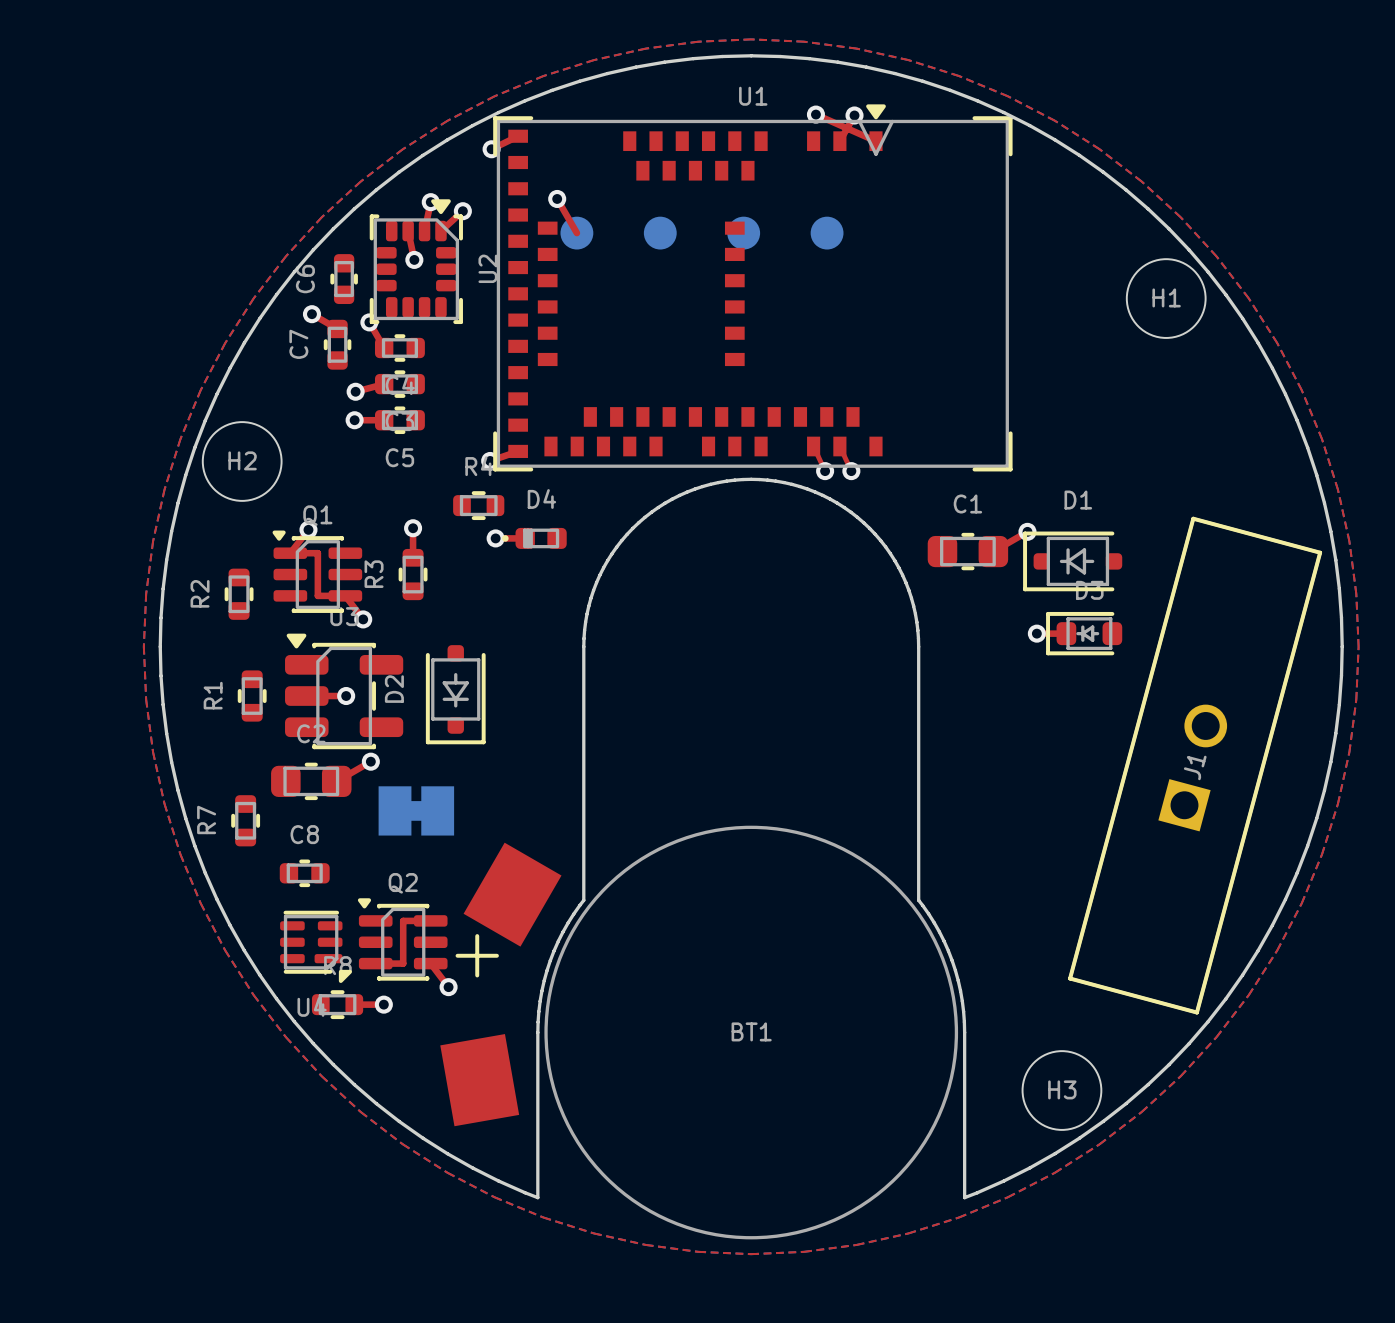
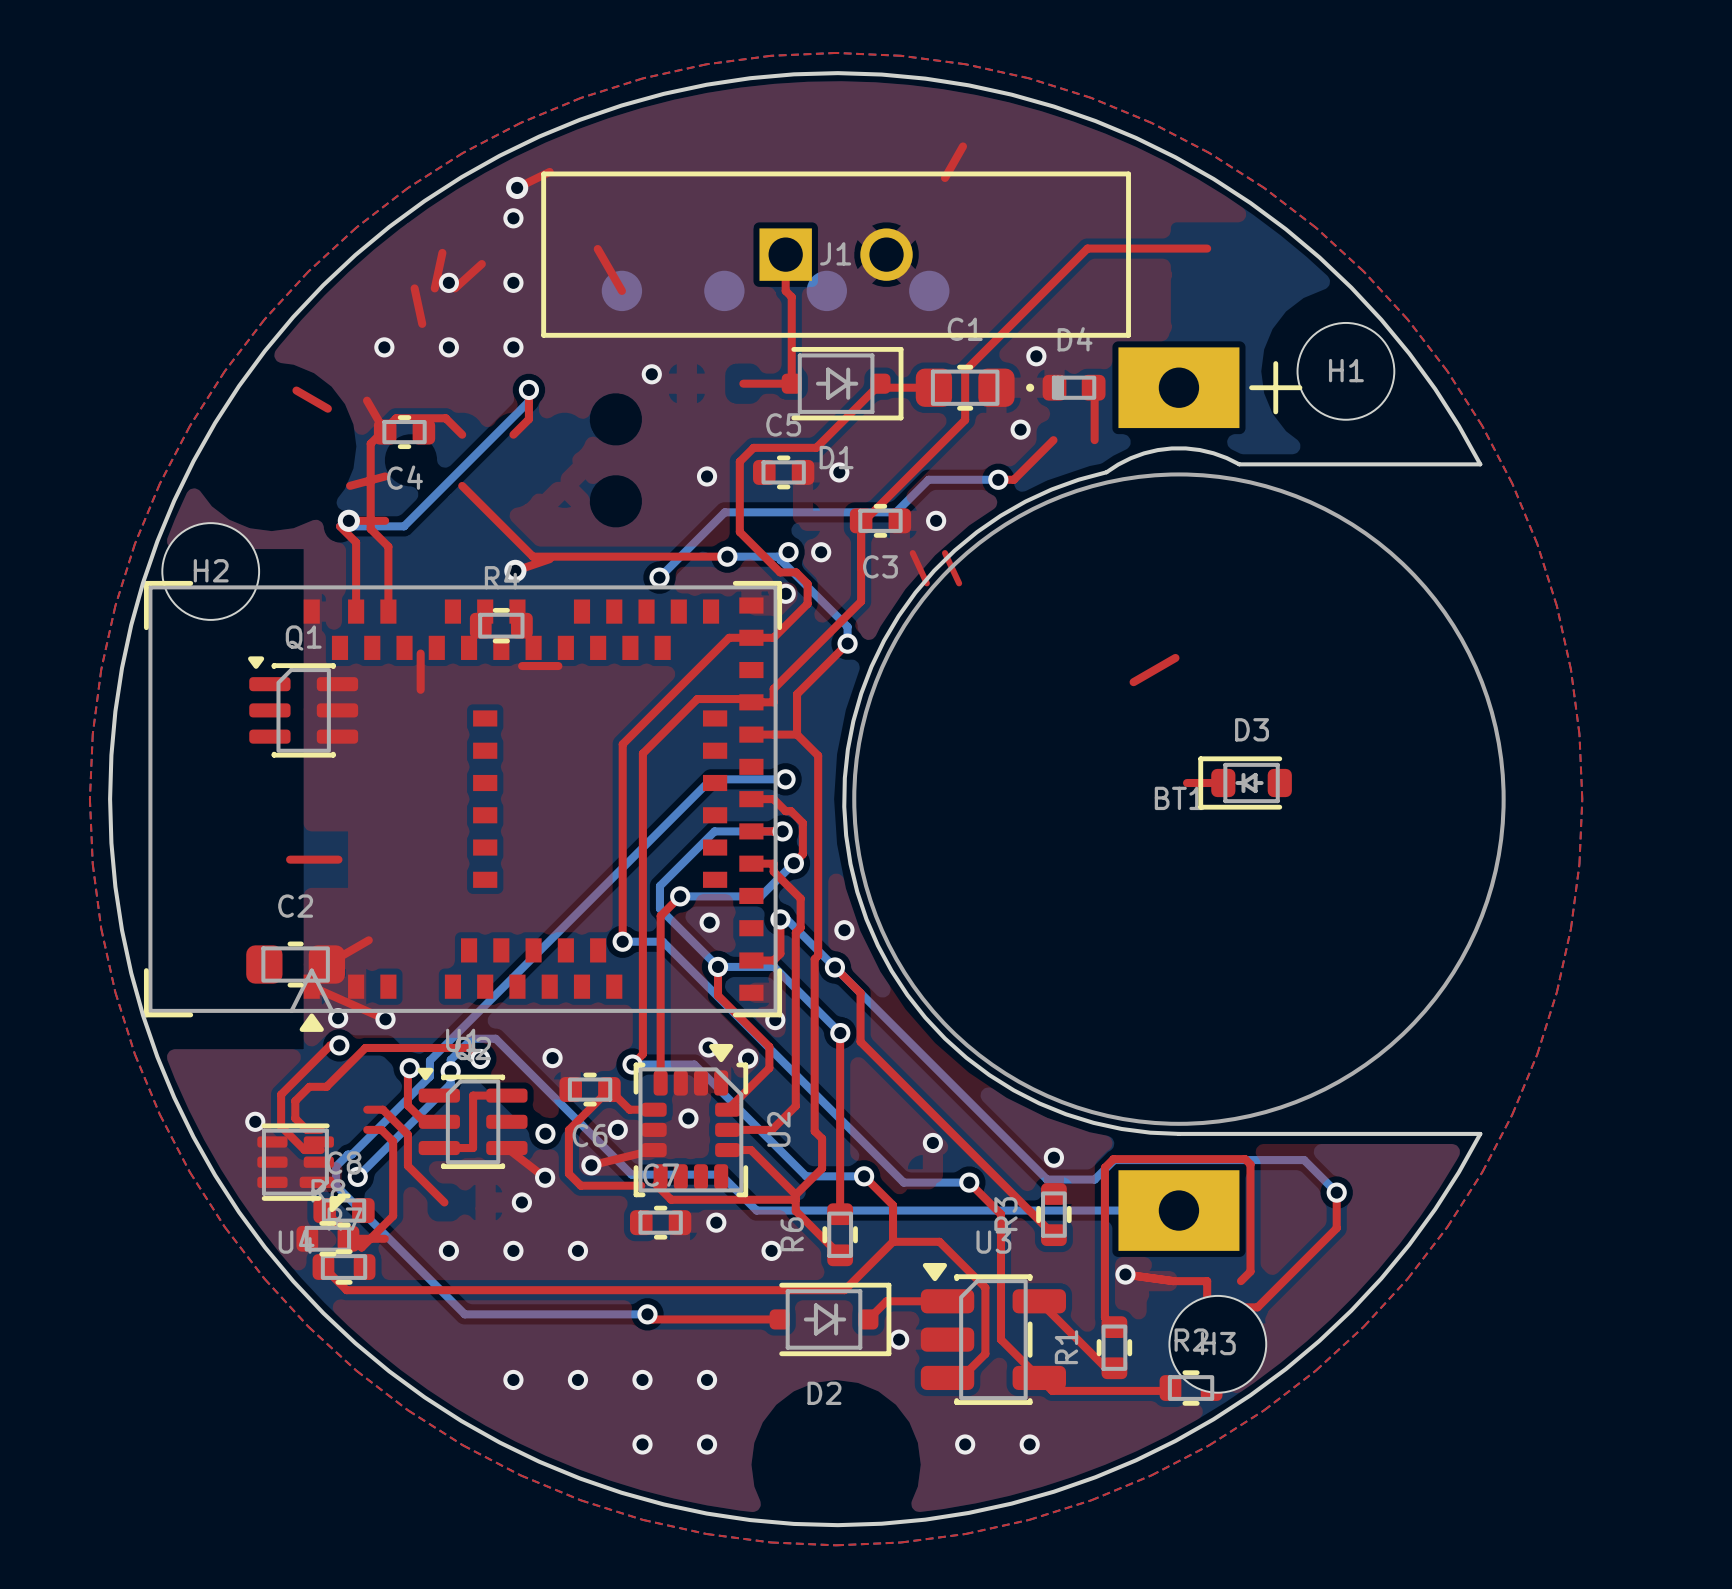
board edge: (751, 55) (693, 58) (635, 67) (552, 90) (472, 125) (422, 155) (376, 189) (333, 228) (294, 271) (244, 342) (217, 394) (194, 447) (171, 531) (163, 588) (160, 646) (166, 733) (185, 818) (205, 872) (230, 925) (259, 975) (294, 1021) (354, 1084) (399, 1121) (447, 1153) (498, 1181) (537, 1197) (537, 1032) (540, 1001) (547, 970) (554, 950) (568, 922) (583, 900) (583, 646) (587, 614) (596, 582) (616, 547) (645, 517) (672, 499) (702, 486) (734, 480) (767, 480) (807, 489) (844, 507) (869, 528) (890, 553) (905, 582) (913, 606) (918, 638) (918, 900) (934, 922) (948, 950) (955, 970) (962, 1001) (964, 1032) (964, 1197) (1029, 1167) (1103, 1121) (1169, 1064) (1208, 1021) (1242, 975) (1285, 899) (1316, 818) (1330, 762) (1339, 704) (1342, 646) (1335, 560) (1324, 503) (1307, 447) (1285, 394) (1242, 318) (1208, 271) (1169, 228) (1126, 189) (1079, 155) (1003, 112) (922, 81) (866, 67) (809, 58) (751, 55) -> (1239, 464) (1213, 453) (1185, 448) (1157, 450) (1144, 453) (1118, 464) (1106, 472) (1078, 479) (1025, 501) (1000, 515) (954, 550) (915, 592) (884, 640) (871, 666) (861, 693) (847, 749) (844, 806) (846, 835) (857, 891) (866, 919) (891, 970) (925, 1017) (944, 1038) (966, 1057) (1013, 1090) (1039, 1103) (1093, 1122) (1150, 1132) (1480, 1133) (1458, 1172) (1409, 1244) (1351, 1310) (1285, 1369) (1250, 1395) (1175, 1440) (1136, 1460) (1054, 1491) (968, 1512) (881, 1523) (837, 1525) (750, 1520) (663, 1504) (621, 1492) (579, 1478) (499, 1442) (424, 1397) (355, 1343) (323, 1313) (265, 1247) (215, 1175) (193, 1137) (157, 1056) (131, 973) (122, 930) (111, 843) (110, 799) (115, 711) (131, 625) (143, 582) (157, 541) (193, 461) (215, 423) (265, 350) (323, 285) (389, 227) (461, 177) (539, 136) (621, 105) (706, 84) (793, 74) (881, 74) (968, 85) (1011, 94) (1054, 106) (1136, 137) (1213, 179) (1285, 229) (1319, 257) (1381, 319) (1435, 389) (1480, 464) (1239, 464)
top track: (815, 114) (875, 141) -> none
via: (815, 114) -> none
via: (854, 115) -> none
via: none -> (513, 218)
via: (557, 198) -> none
top track: none -> (1207, 248) (1087, 248) (965, 370) (965, 420) (861, 524)
via: (430, 202) -> none
top track: none -> (785, 254) (785, 290) (791, 297) (791, 383) (743, 383)
via: (462, 211) -> none
via: none -> (448, 282)
via: none -> (513, 282)
via: (414, 259) -> none
U2 position: (416, 261) -> (690, 1120)
C6 rotation: 0° (344, 279) -> 90° clockwise (590, 1089)
C6 position: (344, 279) -> (590, 1089)
via: none -> (384, 347)
via: none -> (448, 347)
via: none -> (513, 347)
via: none -> (1036, 356)
U1 rotation: 0° (752, 287) -> 180° (463, 806)
U1 position: (752, 287) -> (463, 806)
via: none -> (651, 374)
top track: none -> (933, 387) (884, 387) (880, 383) (816, 447) (753, 447) (739, 461) (739, 532) (780, 572) (796, 572) (807, 583) (807, 603) (773, 637) (729, 637) (622, 744) (622, 941)
top track: none -> (1093, 387) (1094, 440)
top track: none -> (528, 389) (528, 419) (513, 434)
bottom track: none -> (528, 389) (528, 401) (404, 526) (339, 526)
via: none -> (528, 389)
via: (311, 314) -> none
via: (369, 322) -> none
C7 rotation: 0° (337, 344) -> 90° clockwise (660, 1222)
C7 position: (337, 344) -> (660, 1222)
via: none -> (1020, 429)
top track: none -> (462, 434) (445, 418) (396, 418) (370, 443) (370, 528) (388, 546) (388, 611)
top track: none -> (1053, 440) (1013, 479) (998, 479)
via: none -> (839, 472)
C3 position: (399, 384) -> (880, 520)
via: none -> (707, 476)
bottom track: none -> (998, 479) (928, 479) (896, 512) (724, 512) (659, 577)
via: none -> (998, 479)
via: (355, 391) -> none
top track: none -> (462, 485) (532, 556) (727, 556)
C5 position: (399, 420) -> (783, 472)
top track: none -> (861, 520) (861, 601) (773, 688) (773, 702) (751, 702) (748, 699) (697, 699) (642, 753) (642, 1054) (632, 1064)
via: none -> (936, 520)
top track: none -> (339, 526) (356, 542) (356, 611)
via: none -> (788, 552)
via: none -> (821, 552)
bottom track: none -> (727, 556) (777, 556) (847, 626) (847, 643)
via: none -> (727, 556)
C5 name position: C5 (399, 457) -> C5 (783, 424)
via: none -> (659, 577)
via: (825, 471) -> none
via: (851, 471) -> none
via: none -> (785, 593)
top track: none -> (847, 643) (797, 694) (797, 734)
via: none -> (847, 643)
via: (413, 528) -> none
top track: (308, 529) (290, 553) (317, 553) (317, 595) (345, 595) (363, 619) -> none
via: (308, 529) -> none
via: (1027, 531) -> none
via: (495, 538) -> none
D4 position: (534, 538) -> (1065, 387)
C1 position: (967, 551) -> (965, 387)
D1 rotation: 0° (1072, 561) -> 180° (842, 383)
D1 position: (1072, 561) -> (842, 383)
R3 position: (413, 574) -> (1053, 1214)
R2 rotation: 0° (239, 594) -> 90° clockwise (1191, 1388)
R2 position: (239, 594) -> (1191, 1388)
top track: none -> (751, 734) (797, 734)
top track: none -> (797, 734) (818, 755) (818, 955) (814, 959) (814, 1131) (822, 1138) (822, 1168) (795, 1194)
via: (363, 619) -> none
bottom track: none -> (785, 779) (711, 779) (429, 1060) (429, 1076) (352, 1154) (348, 1154) (336, 1166) (336, 1185) (464, 1314) (647, 1314)
via: none -> (785, 779)
via: (1036, 633) -> none
top track: none -> (751, 799) (773, 799) (785, 811) (791, 811) (802, 823) (802, 854) (793, 863)
bottom track: none -> (782, 831) (714, 831) (659, 886) (659, 908) (718, 966) (774, 966) (840, 1033)
via: none -> (782, 831)
U3 position: (344, 691) -> (993, 1333)
D2 rotation: 0° (455, 694) -> 90° counterclockwise (830, 1319)
D2 position: (455, 694) -> (830, 1319)
R1 position: (252, 696) -> (1114, 1347)
via: (346, 696) -> none
bottom track: none -> (793, 863) (760, 896) (680, 896)
via: none -> (793, 863)
top track: none -> (751, 863) (773, 863) (773, 871) (800, 898) (800, 927) (795, 932) (795, 1106) (771, 1129) (727, 1129)
top track: none -> (680, 896) (660, 915) (660, 1082)
via: none -> (680, 896)
top track: none -> (780, 919) (780, 953) (773, 960) (751, 960)
bottom track: none -> (780, 919) (786, 919) (1047, 1179) (1094, 1179) (1114, 1160) (1304, 1160) (1336, 1192)
via: none -> (780, 919)
via: none -> (709, 922)
via: none -> (844, 930)
via: (370, 761) -> none
bottom track: none -> (622, 941) (662, 941) (903, 1182) (969, 1182)
via: none -> (622, 941)
J1 rotation: 0° (1195, 765) -> 75° clockwise (836, 254)
J1 position: (1195, 765) -> (836, 254)
top track: none -> (718, 966) (718, 995) (769, 1046) (769, 1068) (727, 1109)
via: none -> (718, 966)
top track: none -> (834, 967) (860, 993) (860, 1041) (1053, 1235)
via: none -> (834, 967)
top track: none -> (311, 986) (385, 1019)
part: (416, 810) -> none
R7 rotation: 0° (245, 820) -> 90° clockwise (344, 1267)
R7 position: (245, 820) -> (344, 1267)
via: none -> (338, 1018)
BT1 footprint: [440, 825, 959, 1240] -> [852, 347, 1506, 1251]
via: none -> (385, 1019)
via: none -> (775, 1020)
top track: none -> (840, 1033) (840, 1214)
via: none -> (840, 1033)
top track: none -> (339, 1045) (330, 1045) (281, 1094) (281, 1126) (304, 1150) (320, 1150)
via: none -> (339, 1045)
via: none -> (708, 1047)
via: none -> (552, 1058)
via: none -> (748, 1058)
top track: none -> (480, 1058) (469, 1047) (365, 1047) (326, 1086) (309, 1086) (295, 1100) (295, 1118) (306, 1129) (320, 1129)
via: none -> (480, 1058)
bottom track: none -> (632, 1064) (694, 1064) (806, 1176) (864, 1176)
via: none -> (632, 1064)
top track: none -> (409, 1068) (407, 1070) (407, 1105) (424, 1121) (439, 1121)
via: none -> (409, 1068)
via: none -> (450, 1071)
C8 position: (304, 873) -> (344, 1210)
top track: none -> (367, 1109) (382, 1109) (407, 1134) (407, 1165) (444, 1202)
top track: none -> (654, 1109) (629, 1109) (609, 1089) (568, 1130) (568, 1173) (580, 1185) (641, 1185)
via: none -> (688, 1118)
via: none -> (255, 1121)
top track: none -> (367, 1129) (381, 1129) (393, 1141) (393, 1216) (361, 1247) (324, 1210)
via: none -> (617, 1129)
via: none -> (545, 1133)
top track: (430, 920) (403, 920) (403, 963) (375, 963) -> (506, 1095) (473, 1095) (473, 1148) (439, 1148)
via: none -> (932, 1142)
top track: none -> (506, 1148) (545, 1177)
top track: none -> (654, 1150) (591, 1165)
top track: none -> (727, 1150) (751, 1150) (795, 1194)
via: none -> (1053, 1157)
Q2 position: (402, 939) -> (472, 1118)
via: none -> (591, 1165)
top track: none -> (864, 1176) (893, 1205) (893, 1241)
via: none -> (864, 1176)
bottom track: none -> (357, 1176) (450, 1083) (450, 1059) (471, 1038) (495, 1038) (631, 1174) (720, 1174) (756, 1210) (1178, 1210)
via: none -> (357, 1176)
via: none -> (545, 1177)
top track: none -> (969, 1182) (1000, 1214) (1000, 1339) (1052, 1390) (1167, 1390) (1170, 1388)
via: none -> (969, 1182)
top track: none -> (656, 1184) (671, 1199) (795, 1199)
top track: (430, 963) (448, 987) -> none
top track: none -> (1336, 1192) (1336, 1228) (1257, 1307) (1240, 1307)
via: none -> (1336, 1192)
top track: none -> (795, 1194) (795, 1210) (840, 1255)
via: none -> (521, 1202)
via: (448, 987) -> none
via: none -> (716, 1222)
R6: none -> (840, 1234)
via: (383, 1004) -> none
top track: none -> (893, 1241) (939, 1241) (985, 1287) (985, 1353) (961, 1377) (947, 1377)
top track: none -> (893, 1241) (844, 1290) (346, 1290) (323, 1267)
via: none -> (448, 1250)
via: none -> (513, 1250)
via: none -> (577, 1250)
via: none -> (771, 1250)
top track: none -> (1125, 1274) (1173, 1281) (1207, 1281) (1207, 1333) (1240, 1333)
via: none -> (1125, 1274)
top track: none -> (1240, 1281) (1250, 1271) (1250, 1164) (1245, 1159) (1113, 1159) (1104, 1167) (1104, 1317) (1114, 1327)
top track: none -> (947, 1301) (886, 1301) (868, 1319)
top track: none -> (1039, 1301) (1106, 1368) (1114, 1368)
top track: none -> (647, 1314) (652, 1319) (779, 1319)
via: none -> (647, 1314)
via: none -> (899, 1339)
via: none -> (513, 1379)
via: none -> (577, 1379)
via: none -> (642, 1379)
via: none -> (707, 1379)
via: none -> (642, 1444)
via: none -> (707, 1444)
via: none -> (965, 1444)
via: none -> (1029, 1444)

